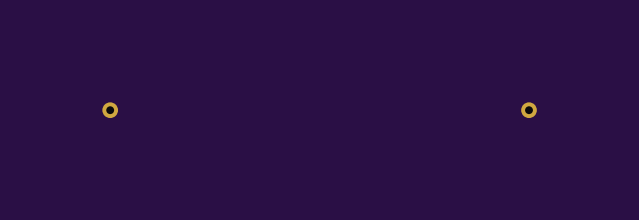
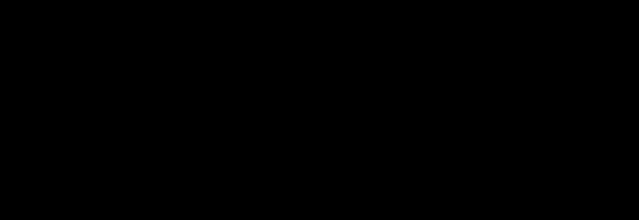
via: (110, 110) -> none
via: (529, 110) -> none

